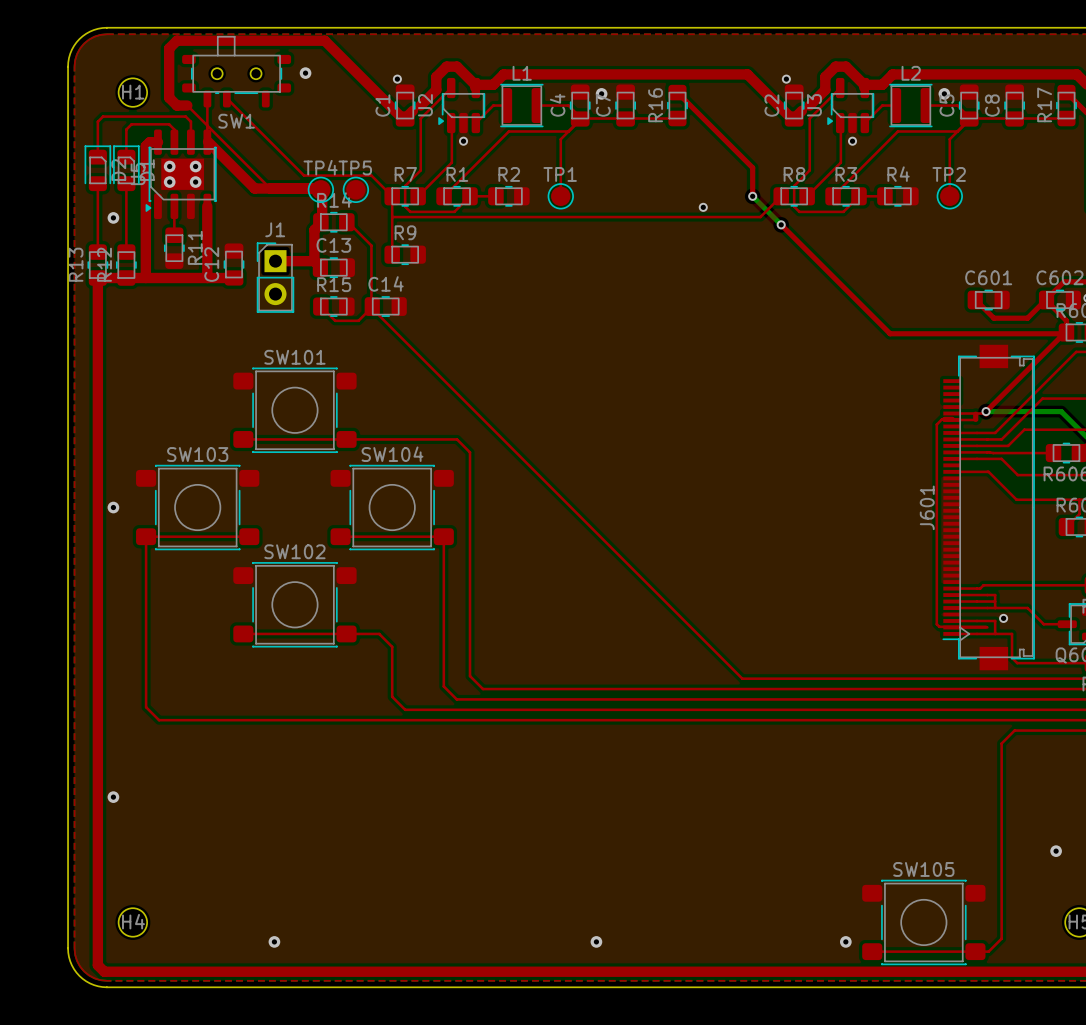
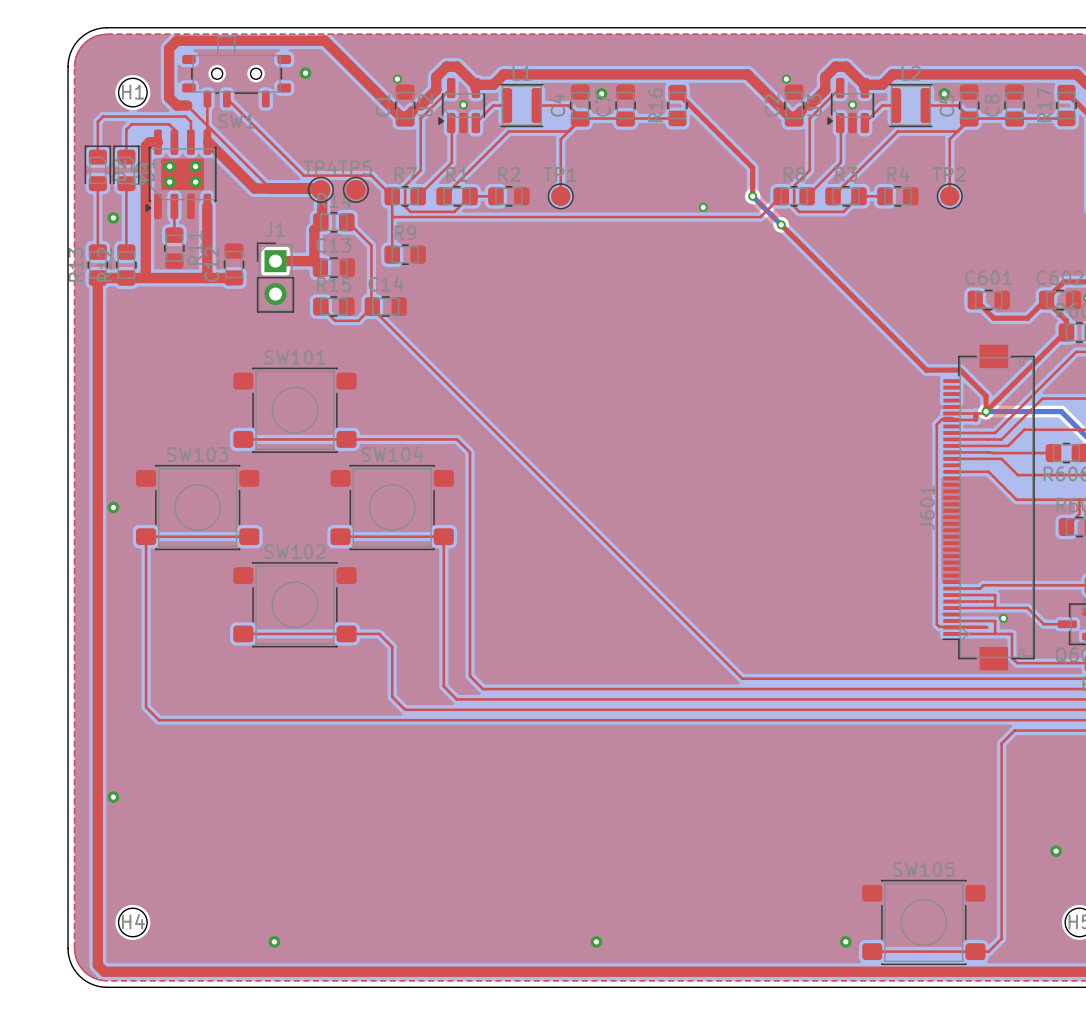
via position: (463, 141) -> (463, 104)
via position: (852, 141) -> (852, 104)
top track: (890, 333) (1063, 333) -> (890, 333) (926, 370) (960, 370) (986, 396) (986, 411)

